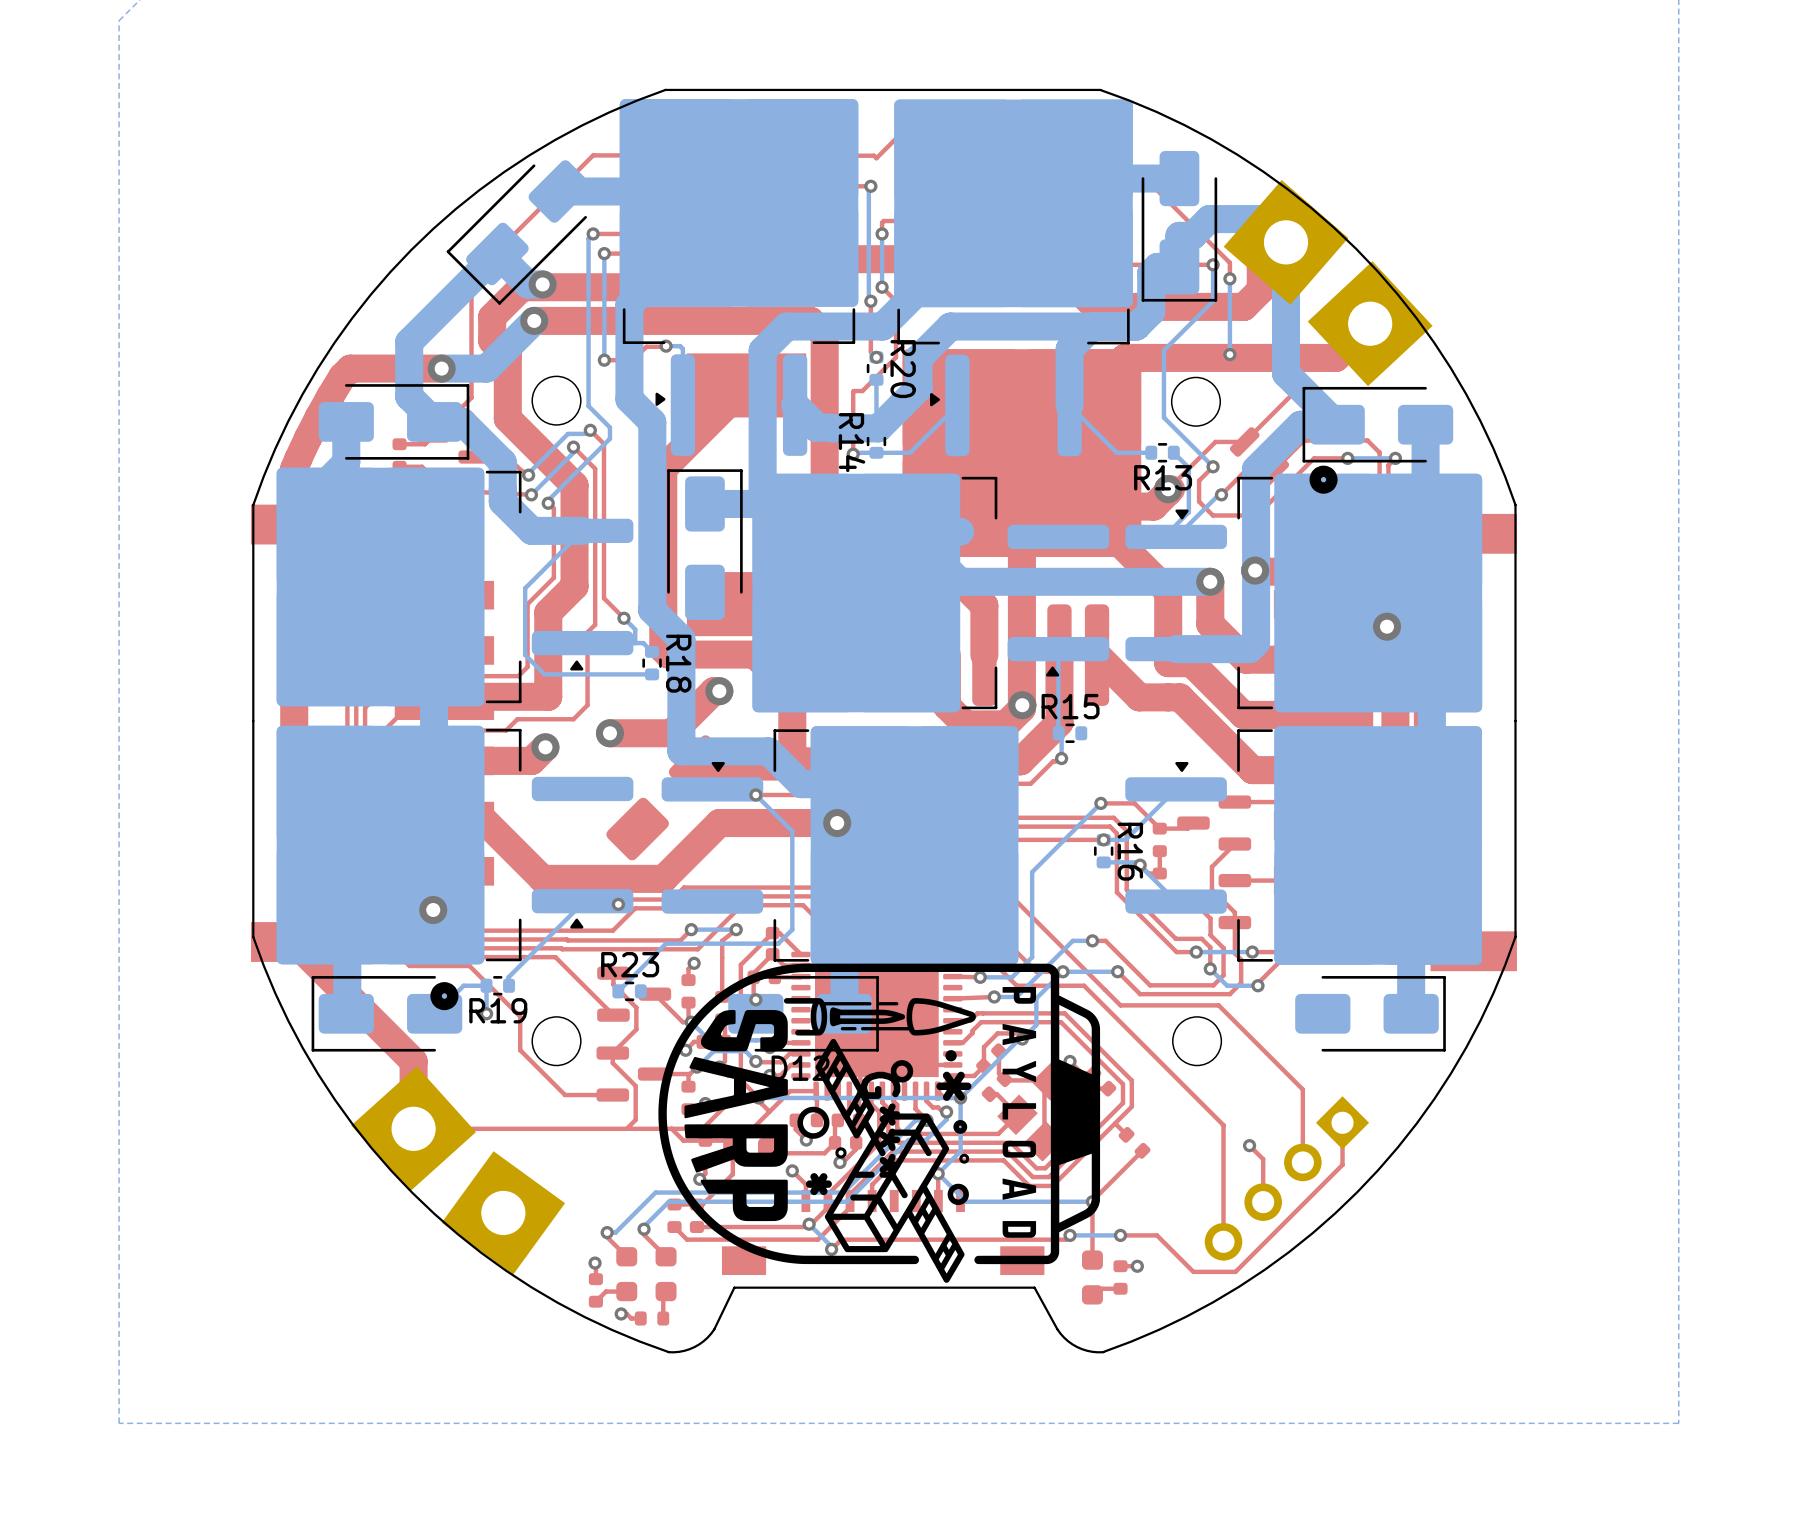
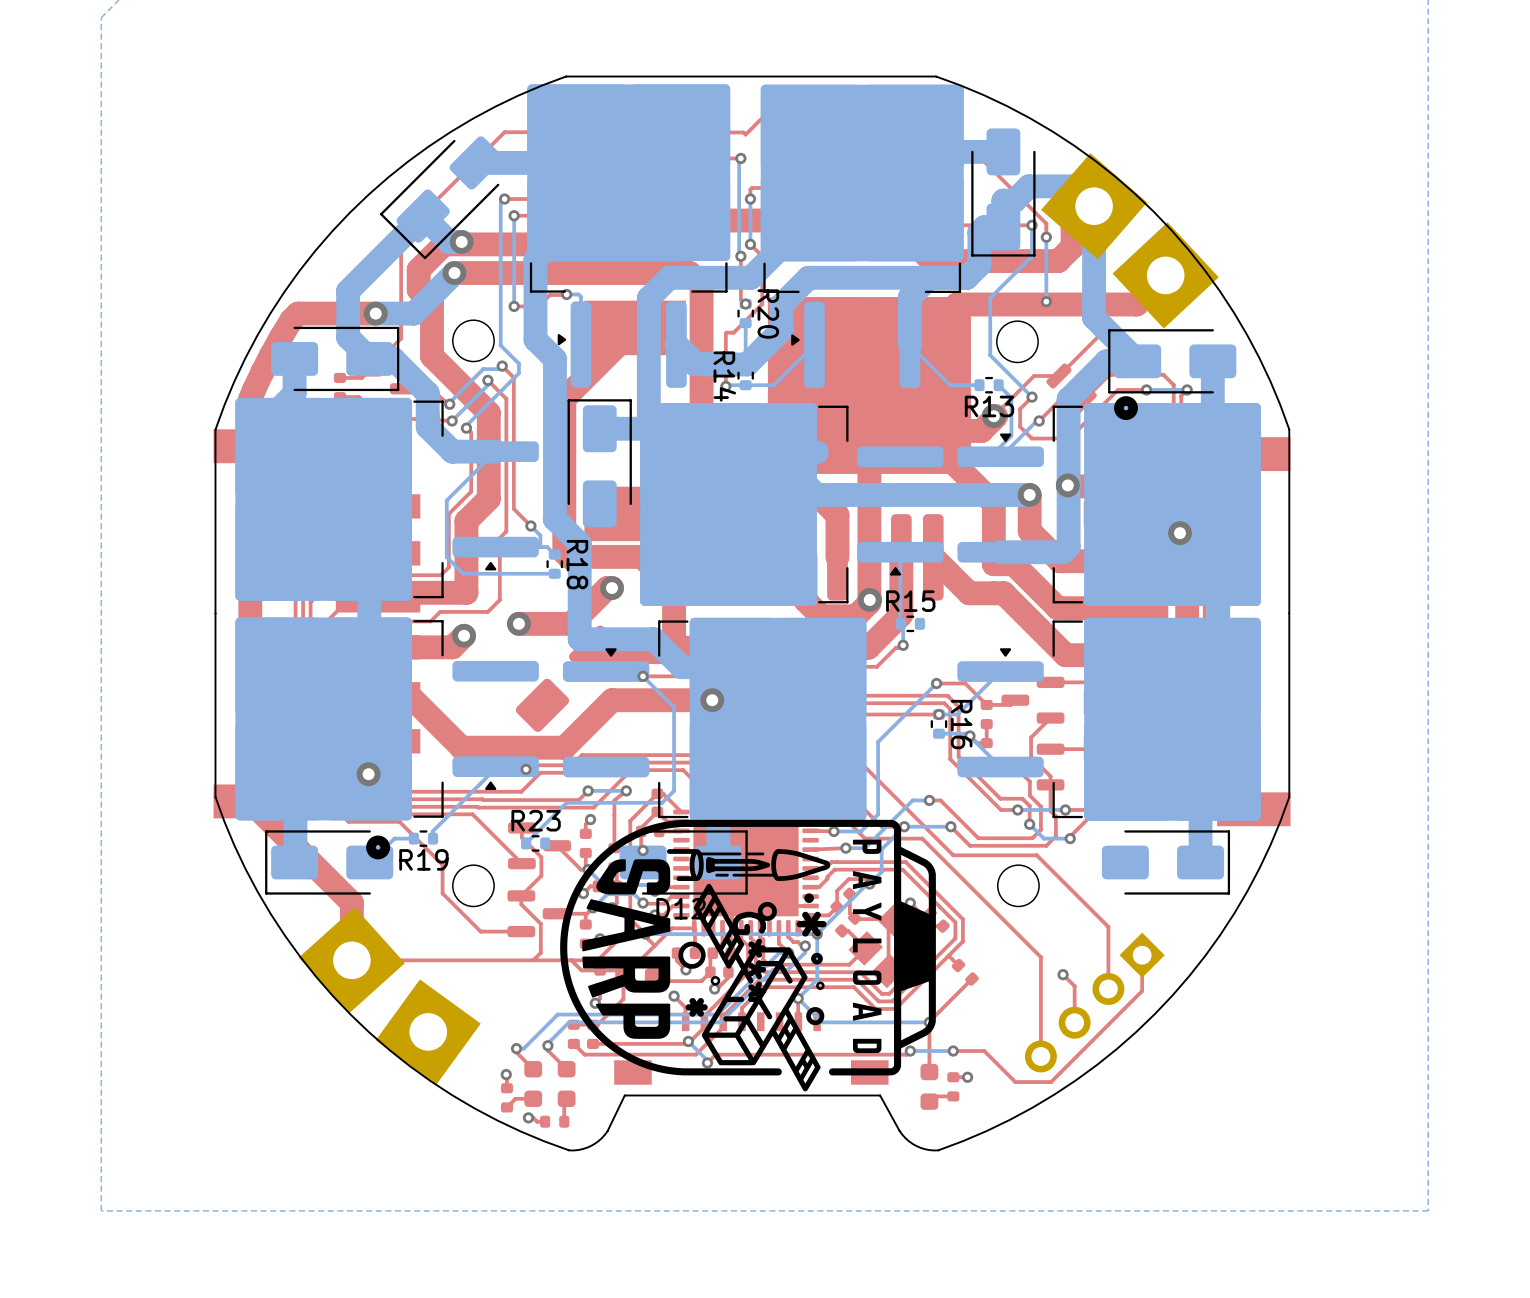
bottom track: (486, 985) (486, 1013) -> none
via: (486, 1013) -> none

